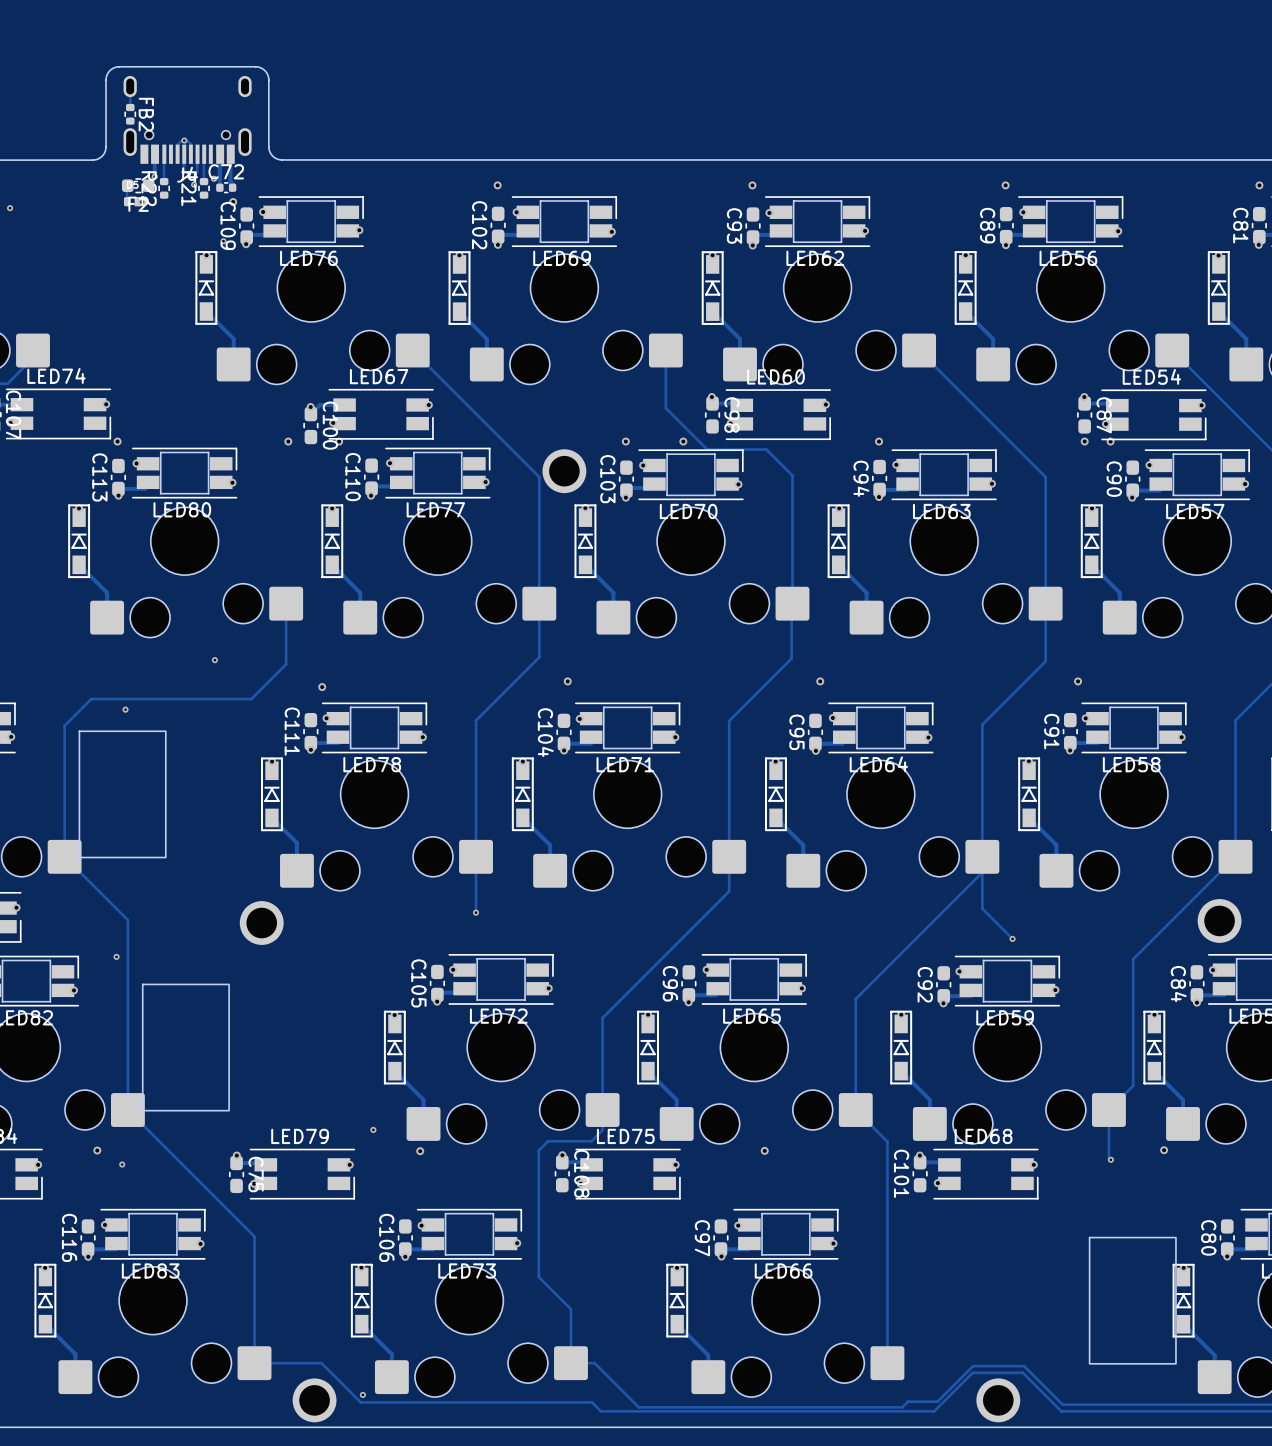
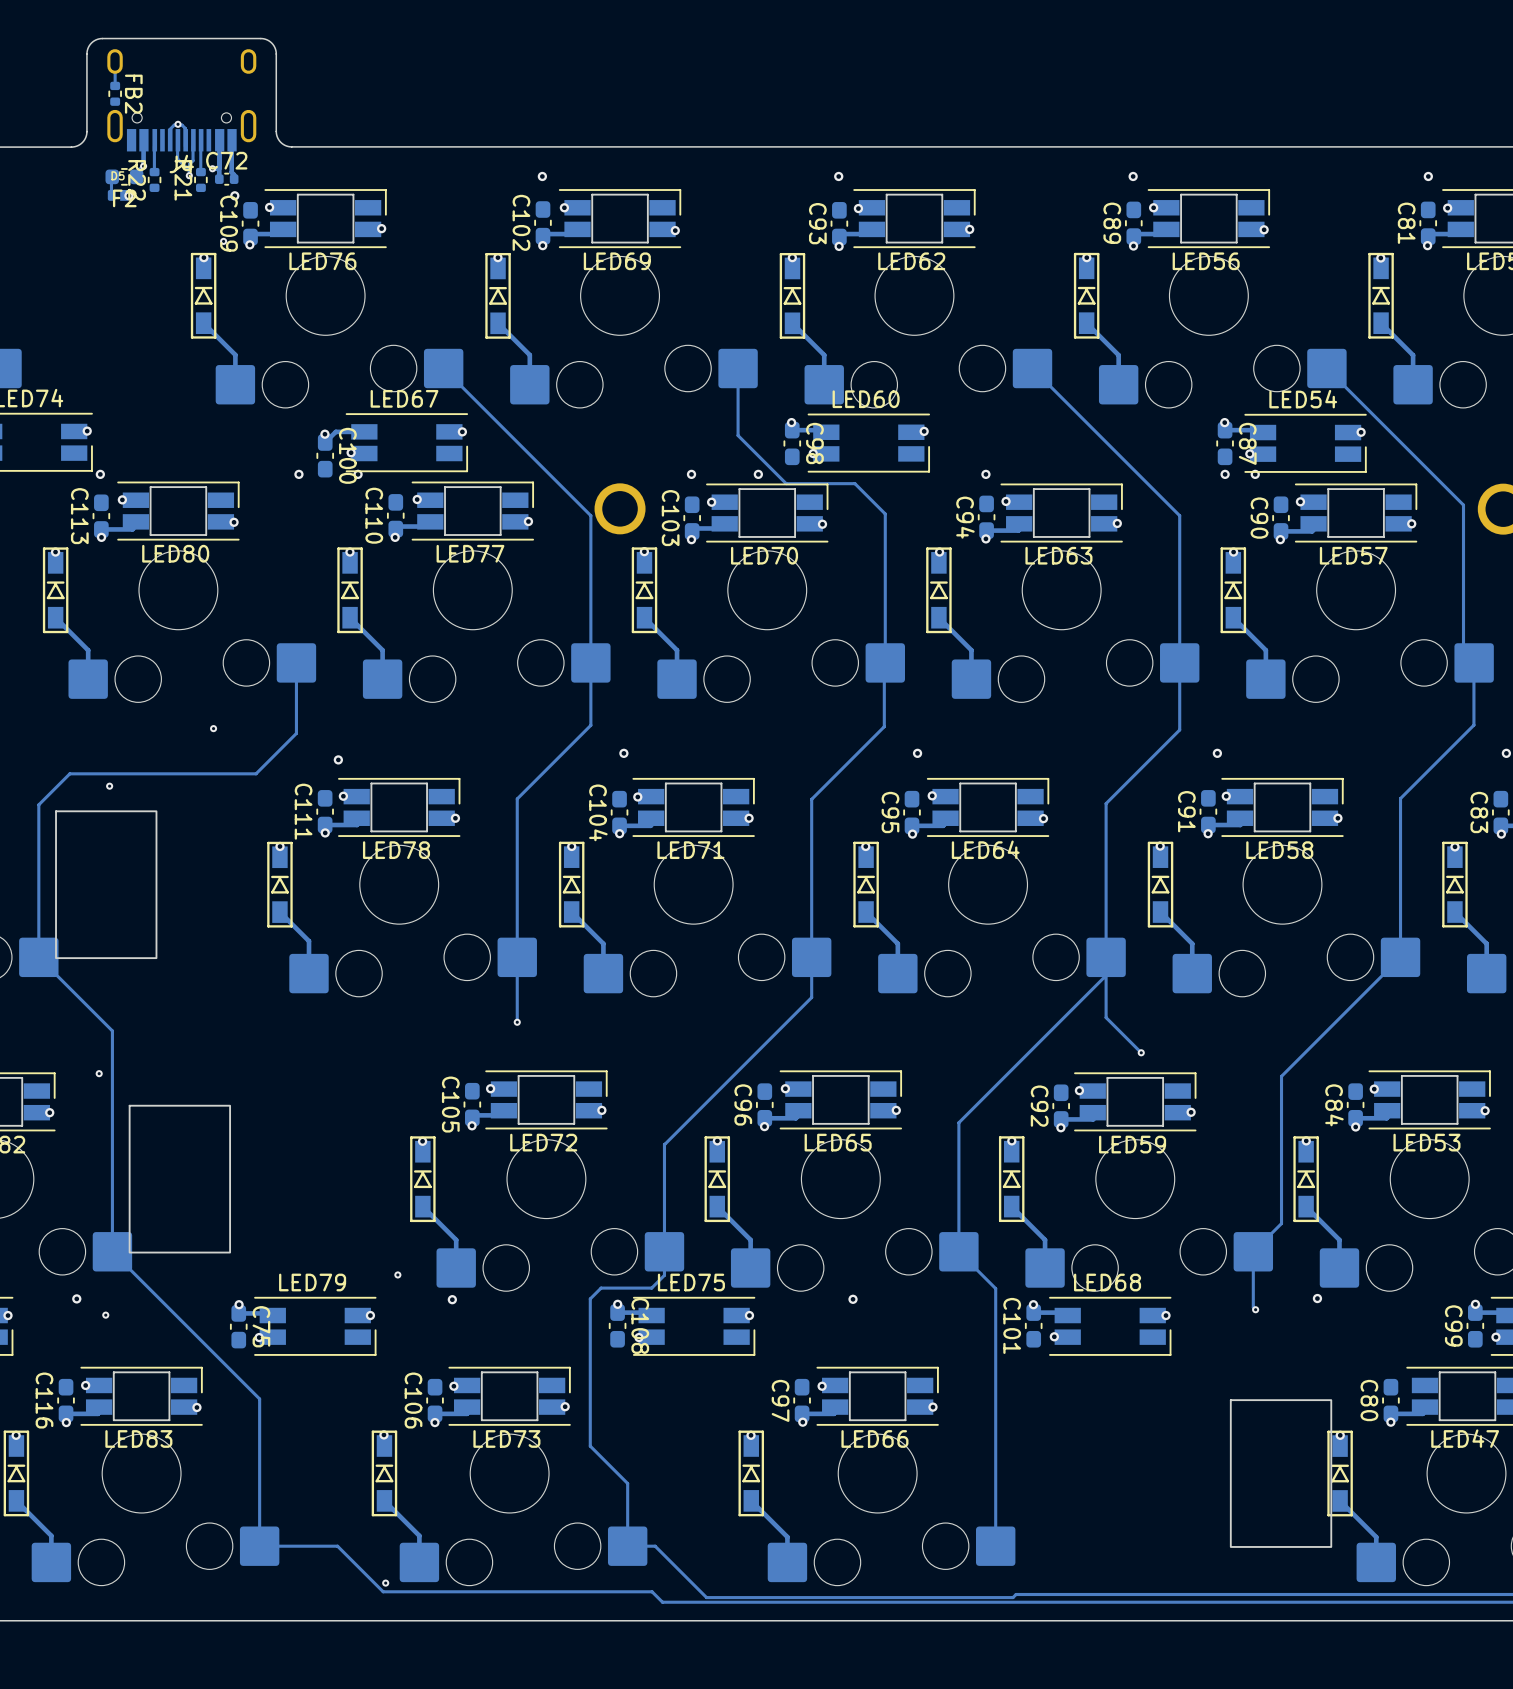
part: (1219, 920) -> none
part: (261, 923) -> none
part: (314, 1400) -> none
part: (998, 1400) -> none
track: (1062, 1404) (1024, 1366) (973, 1366) (937, 1401) (907, 1401) (904, 1404) -> (1199, 1594) (1016, 1594)
track: (1061, 1411) (1022, 1372) (972, 1372) (934, 1411) -> (1198, 1602) (1050, 1602)

